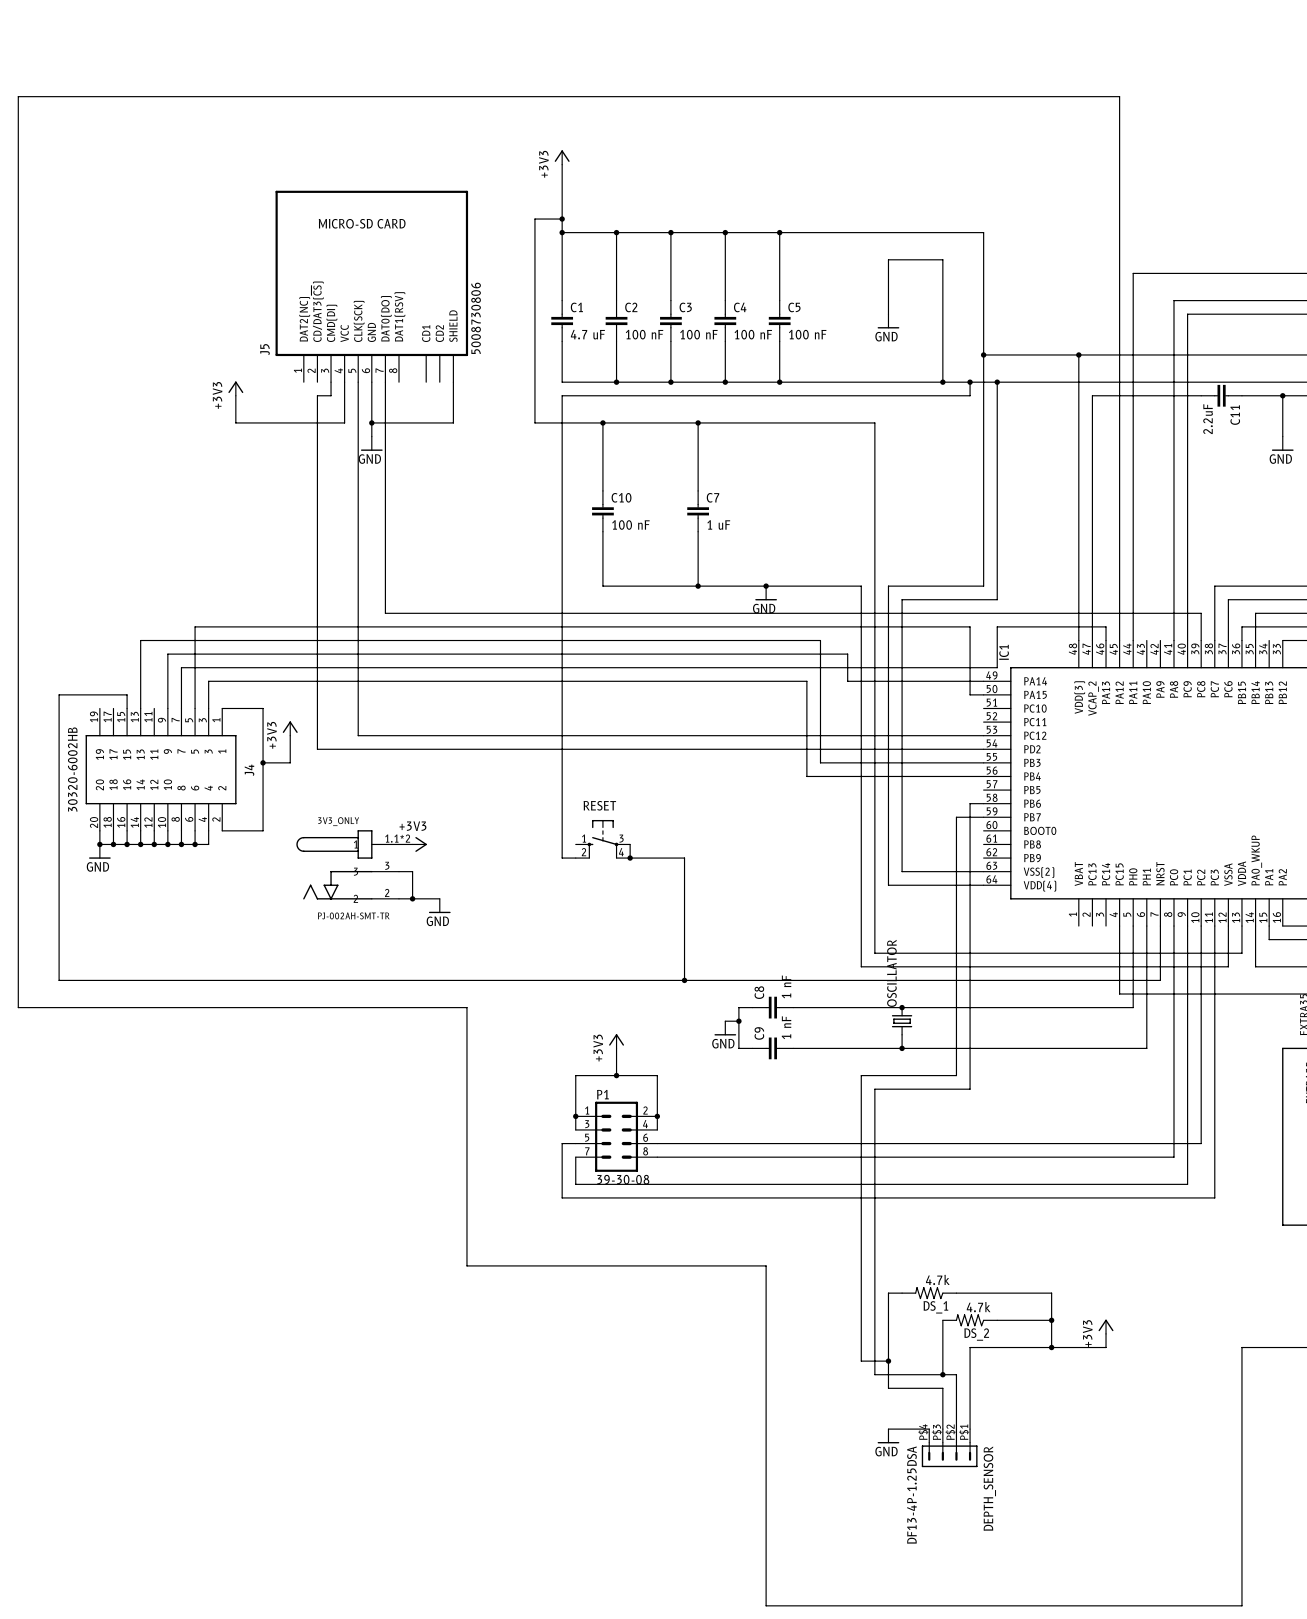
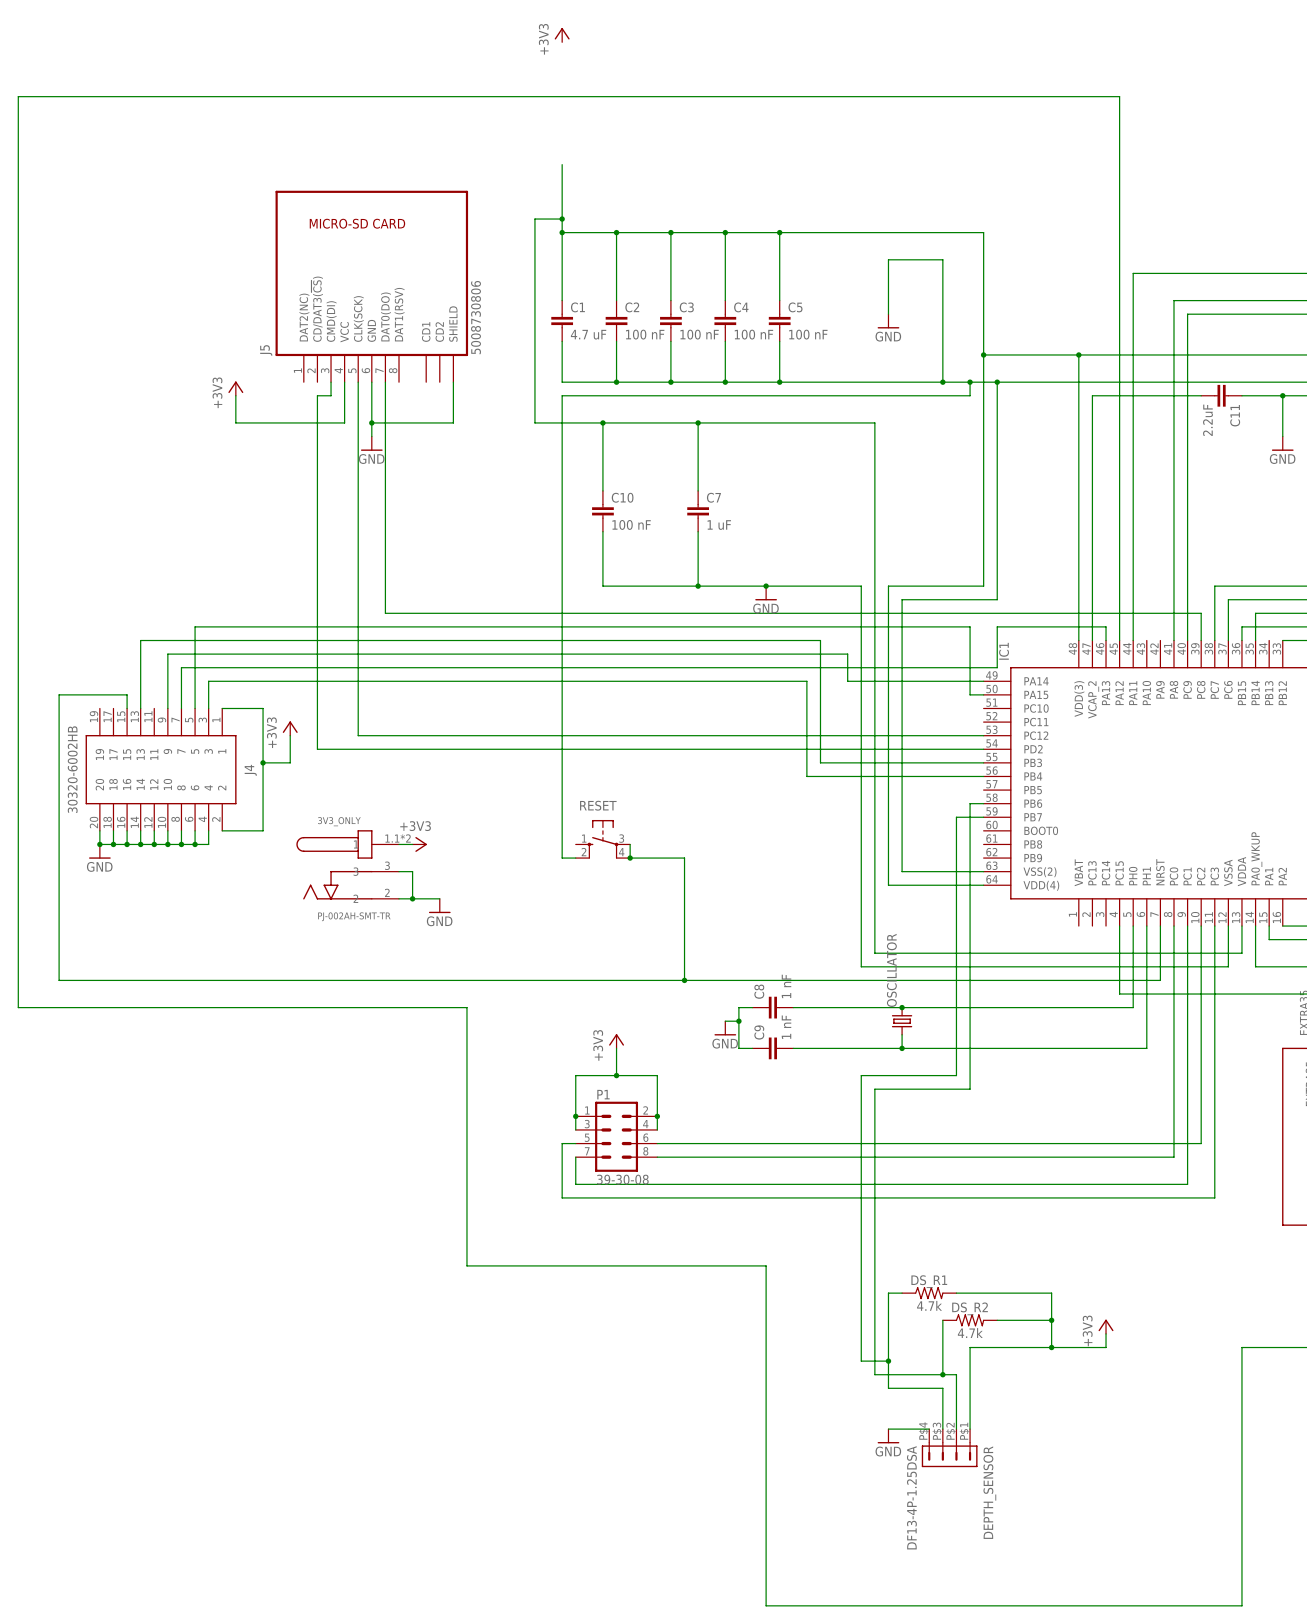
power symbol position: +3V3 (562, 157) -> +3V3 (562, 35)
DS_1: 4.7k (929, 1293) -> none
DS_R1: none -> 4.7k (929, 1293)
DS_2: 4.7k (970, 1320) -> none
DS_R2: none -> 4.7k (970, 1320)

